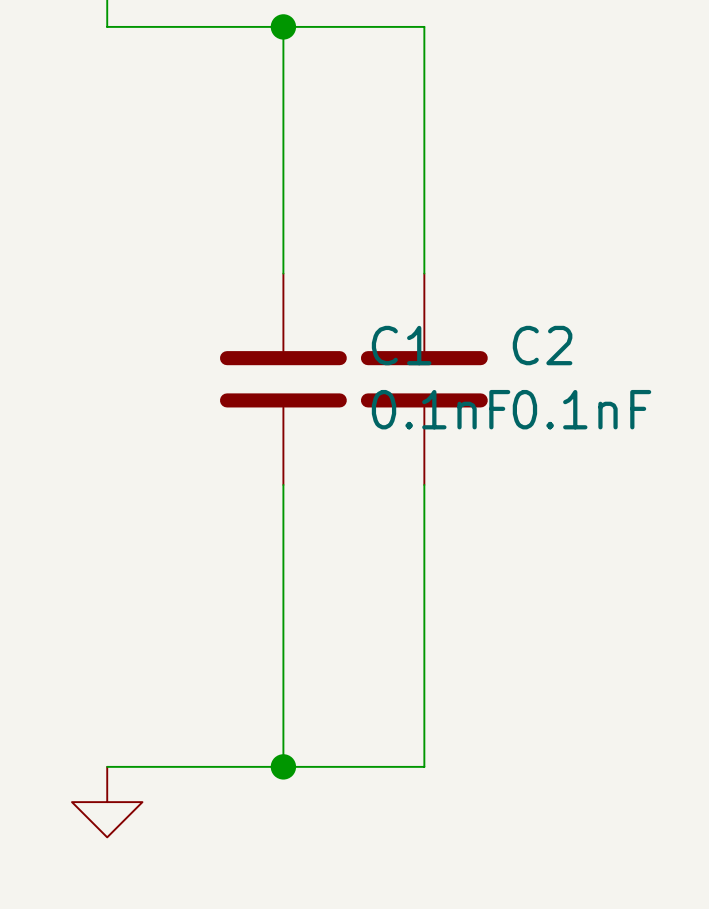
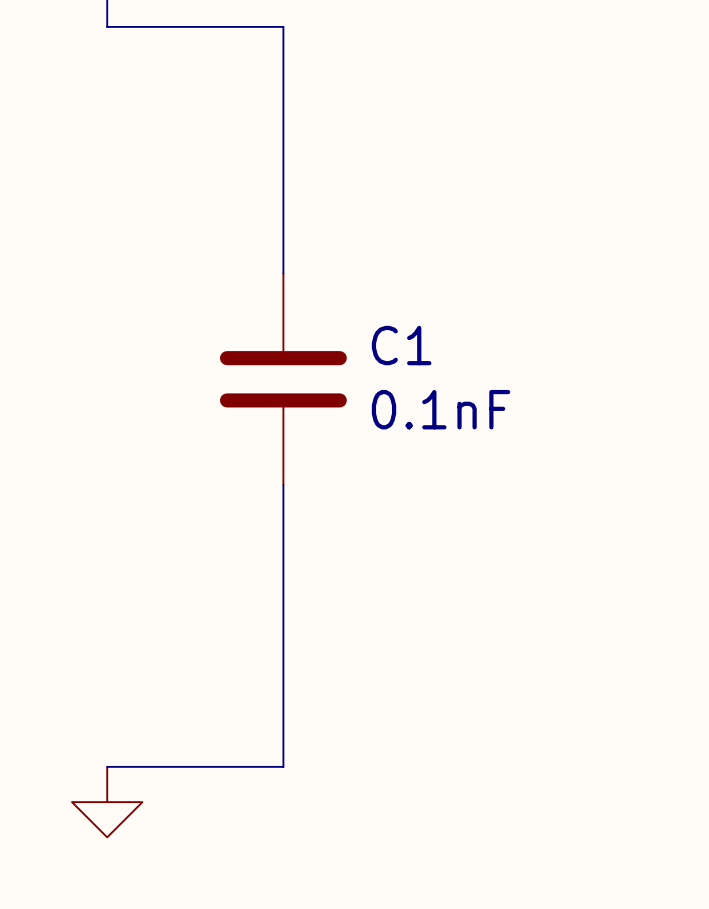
wire: (283, 26) (424, 26) (424, 273) -> none
junction: (283, 26) -> none
C2: 0.1nF (424, 379) -> none
wire: (424, 484) (424, 766) (283, 766) -> none
junction: (283, 766) -> none

